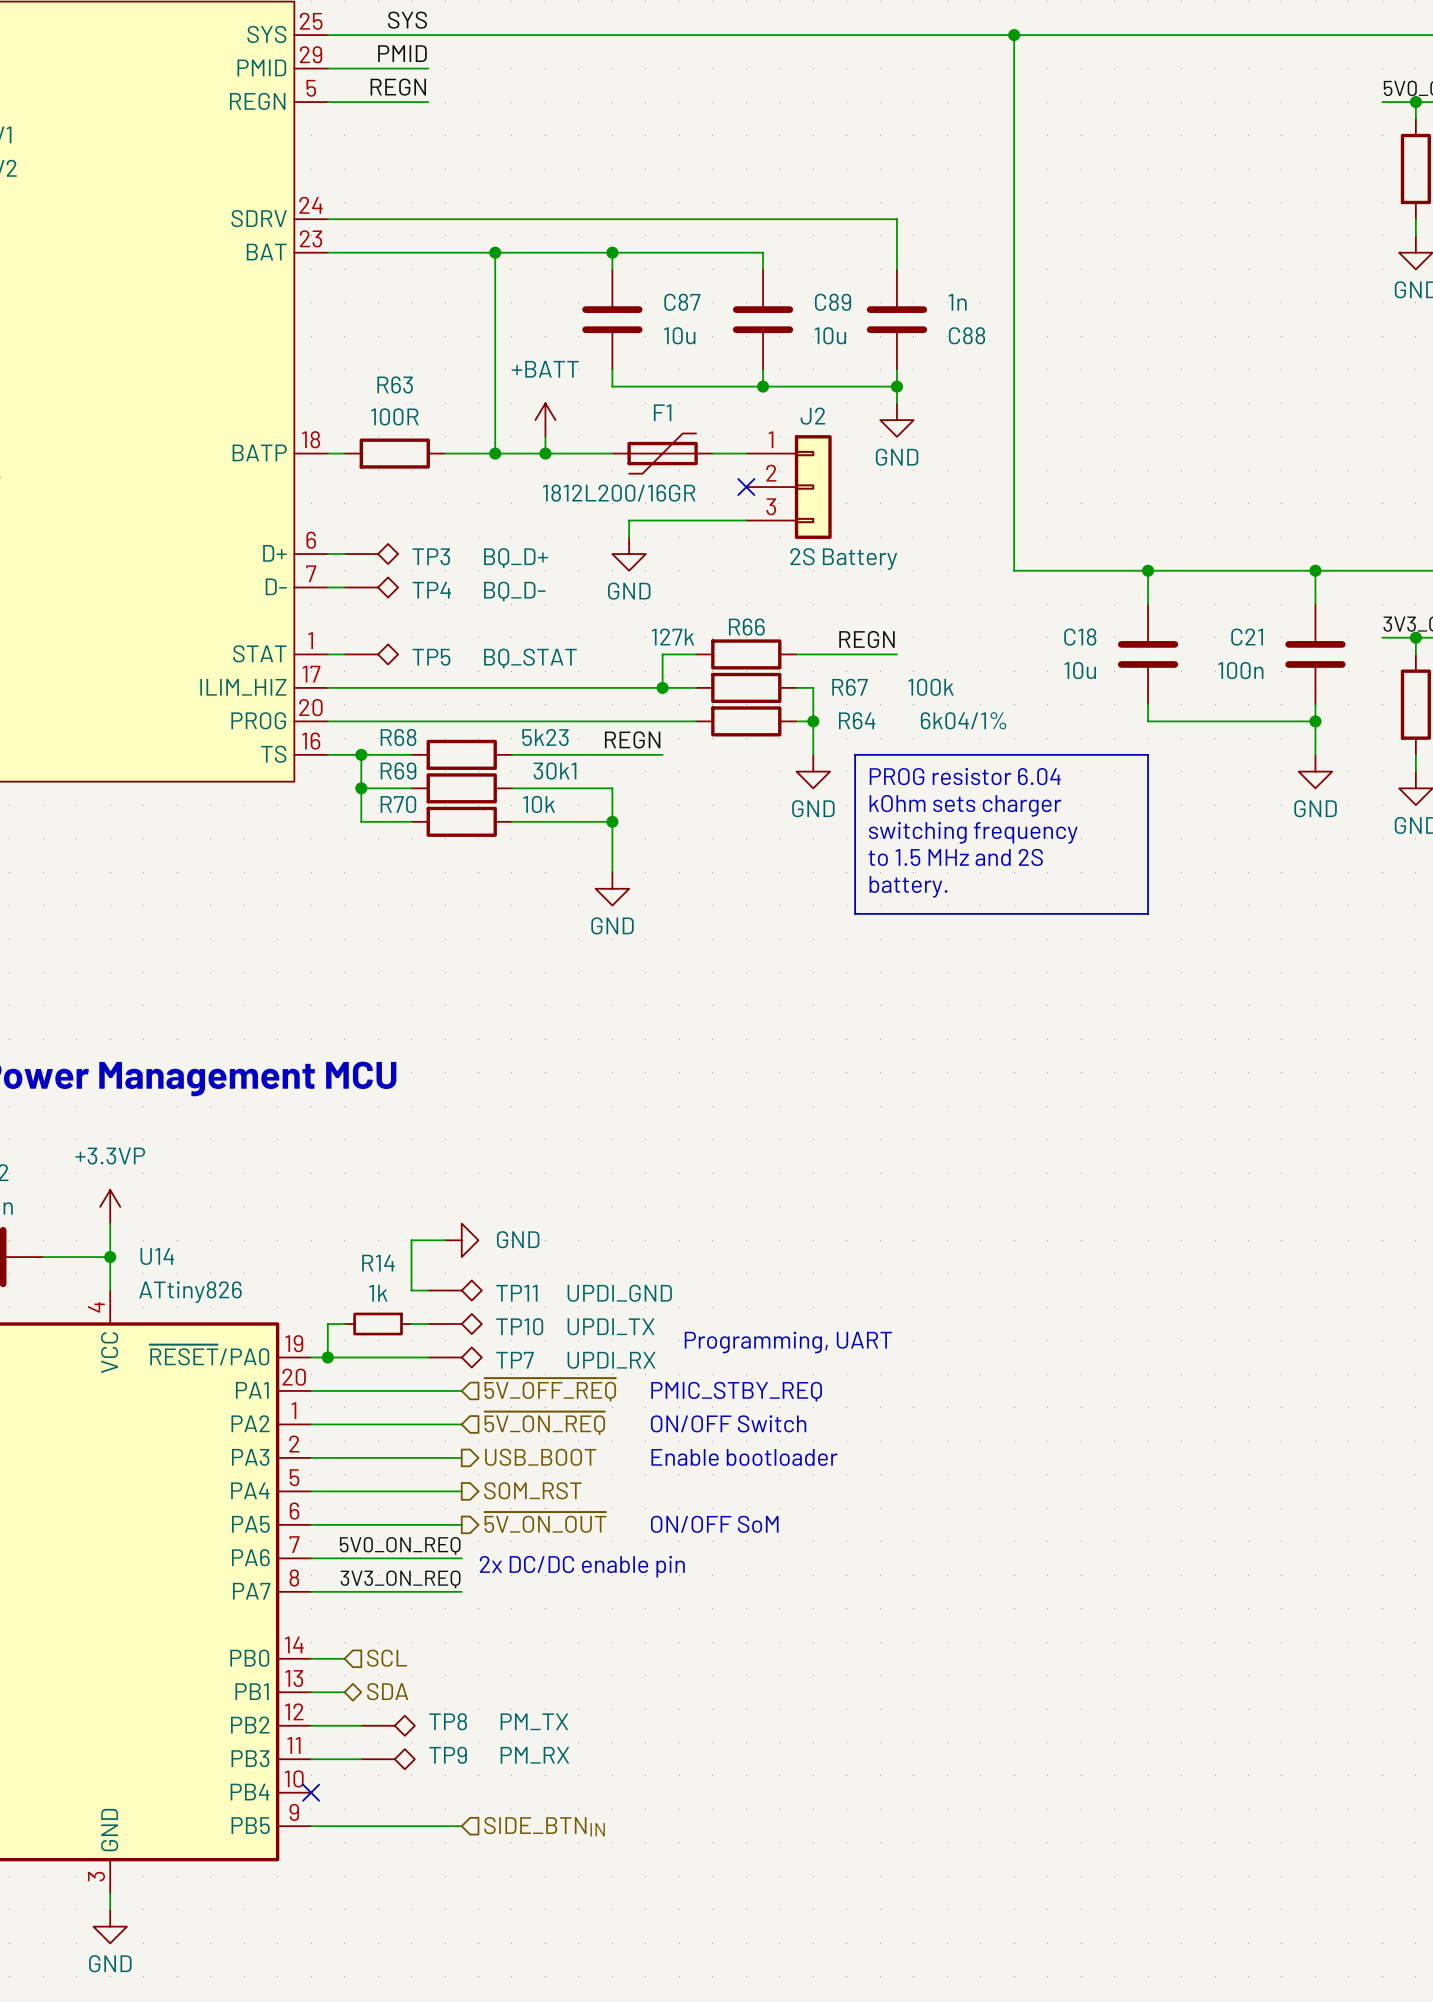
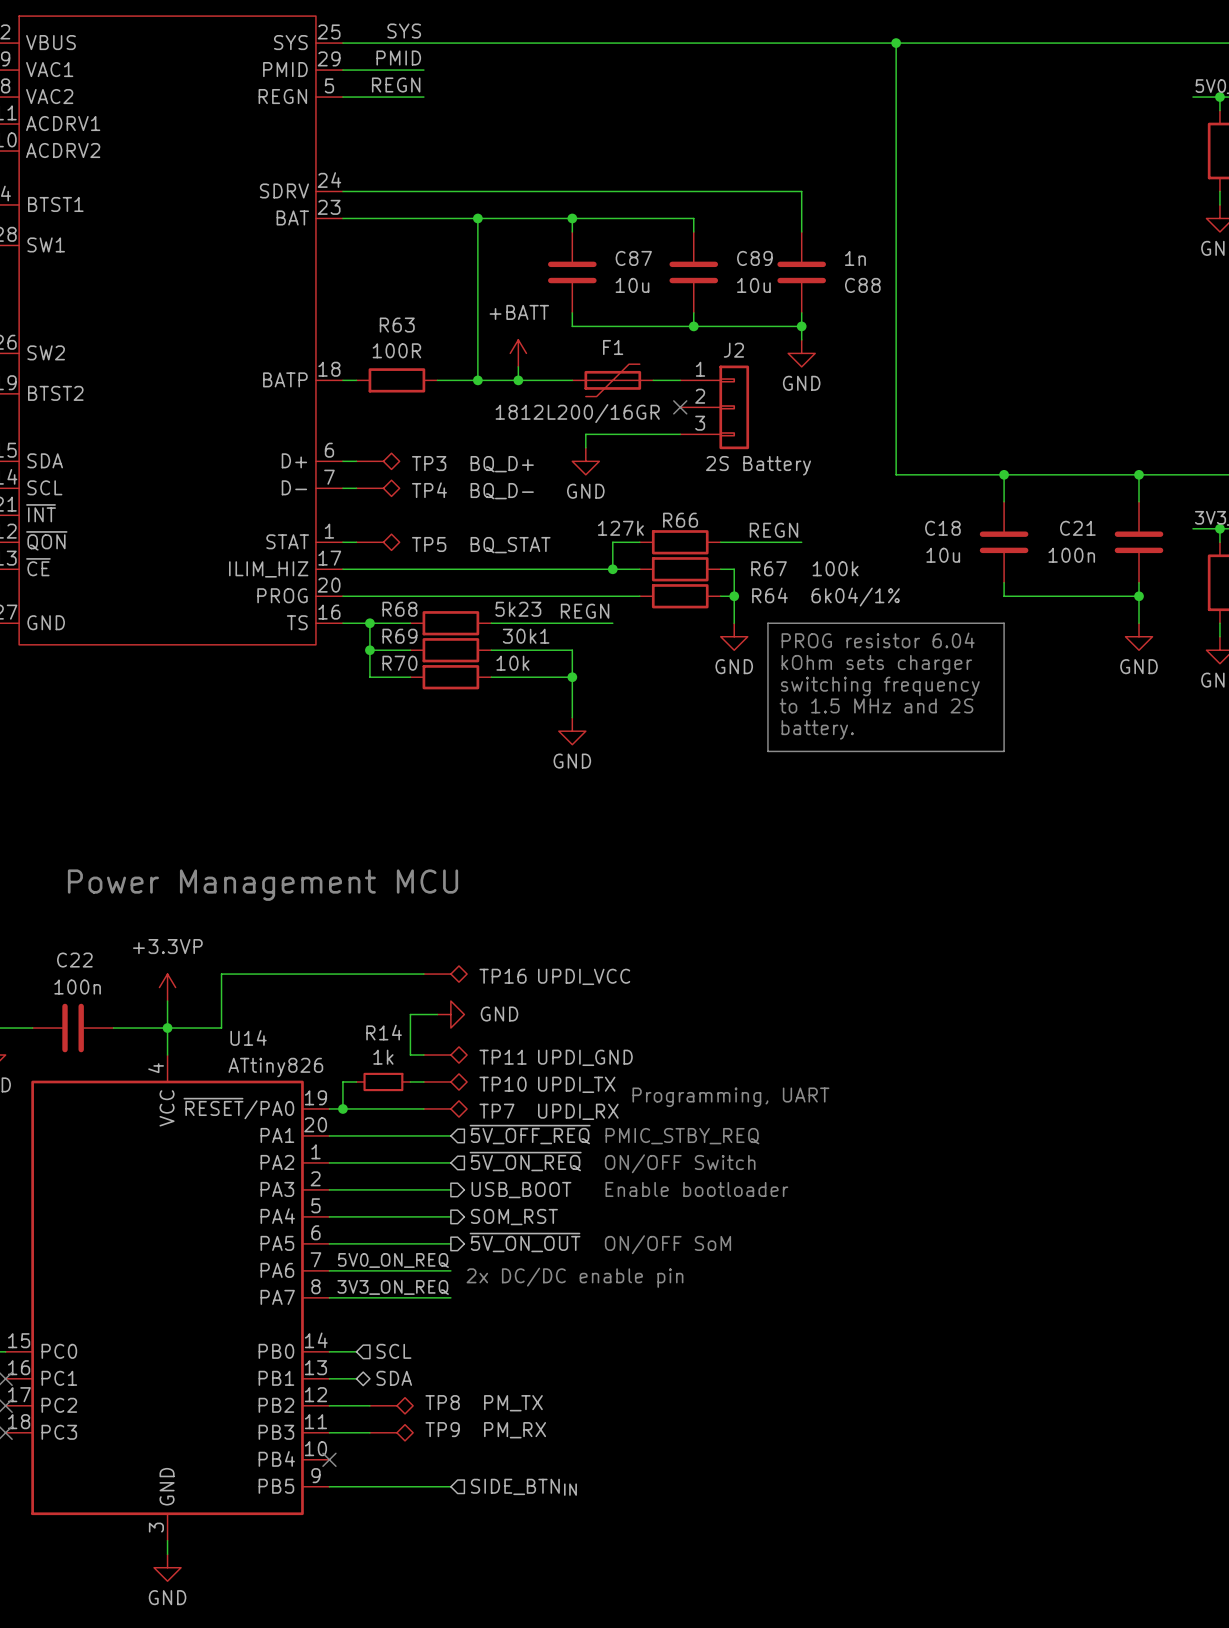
wire: none -> (423, 974) (221, 974) (221, 1028) (167, 1028)
TP16: none -> UPDI_VCC (445, 974)
U14 name position: U14 (157, 1256) -> U14 (248, 1037)
U14 value position: ATtiny826 (190, 1292) -> ATtiny826 (275, 1067)

